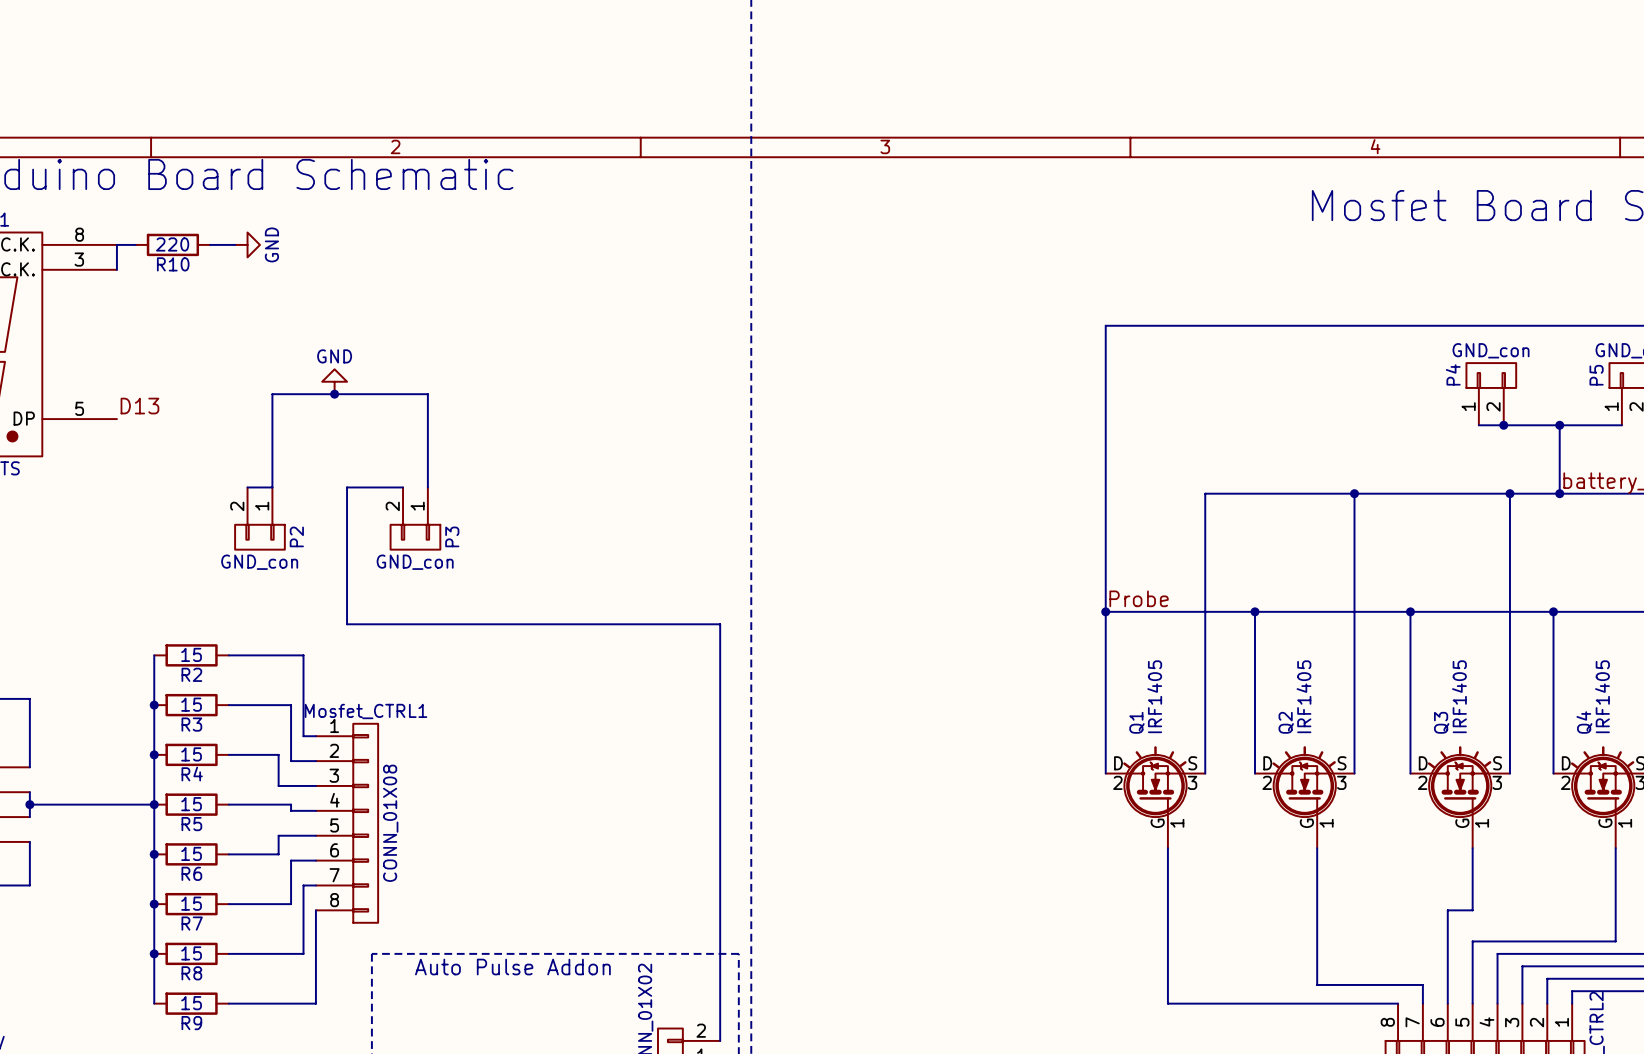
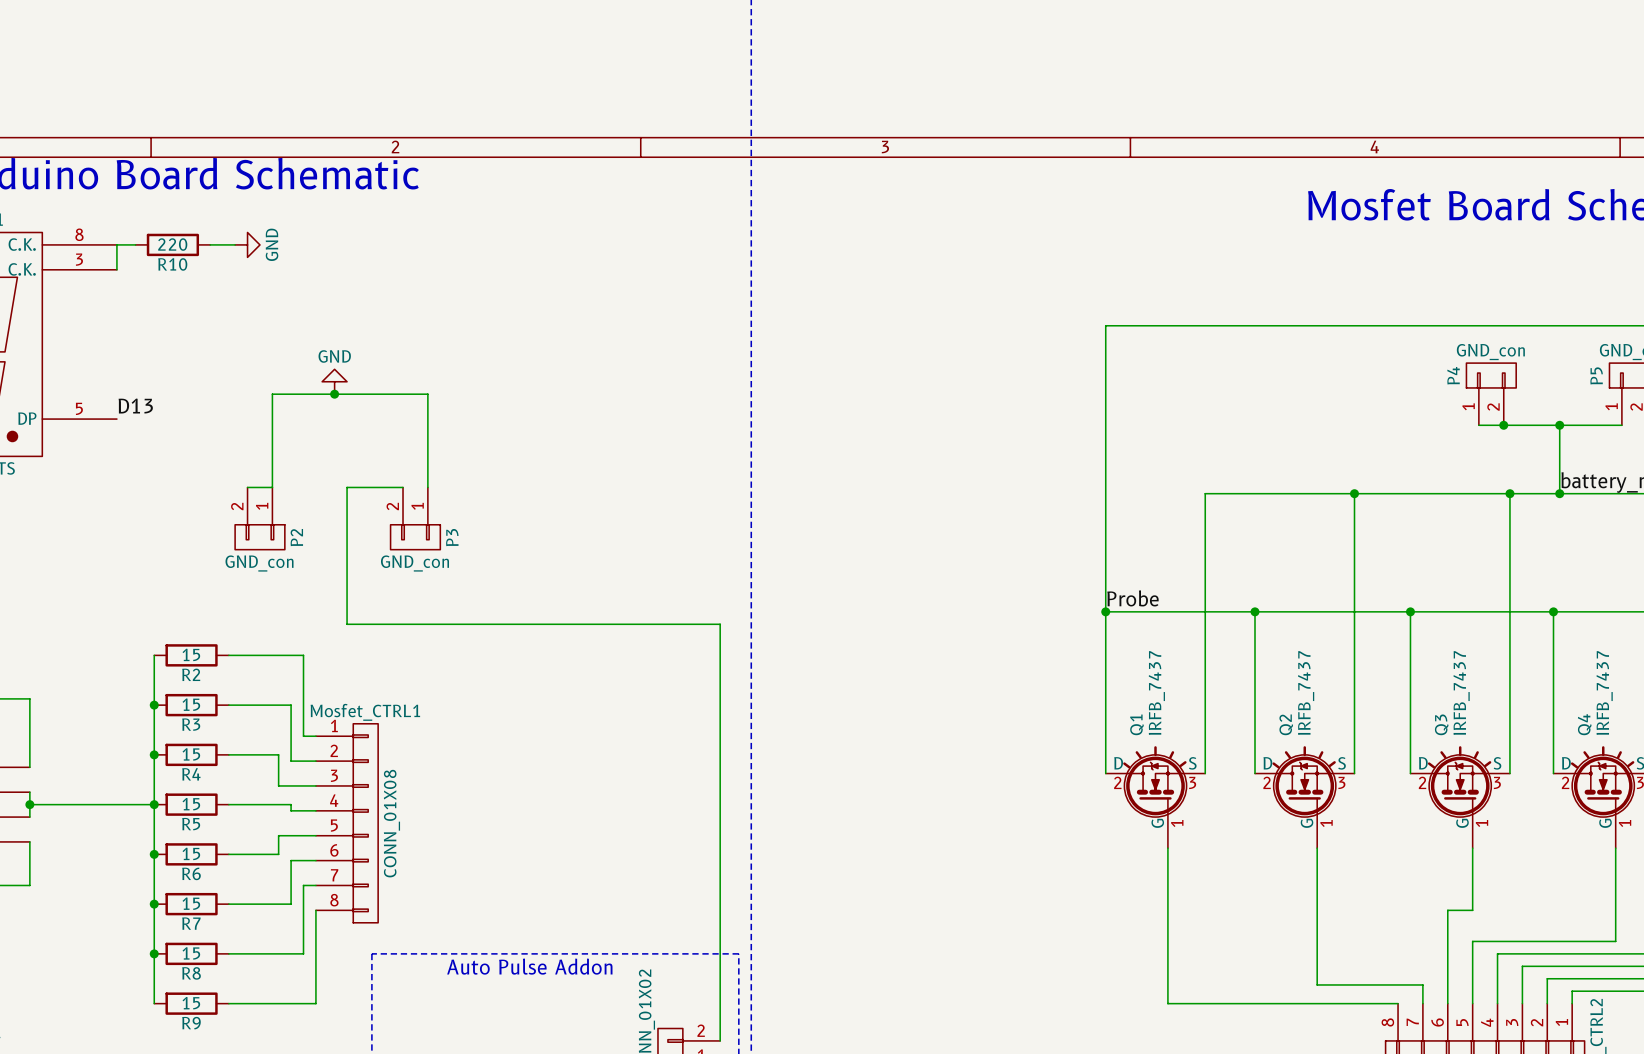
Q1 value: IRF1405 (1154, 696) -> IRFB_7437 (1156, 693)
Q2 value: IRF1405 (1303, 696) -> IRFB_7437 (1306, 693)
Q3 value: IRF1405 (1459, 696) -> IRFB_7437 (1461, 693)
Q4 value: IRF1405 (1602, 696) -> IRFB_7437 (1604, 693)

